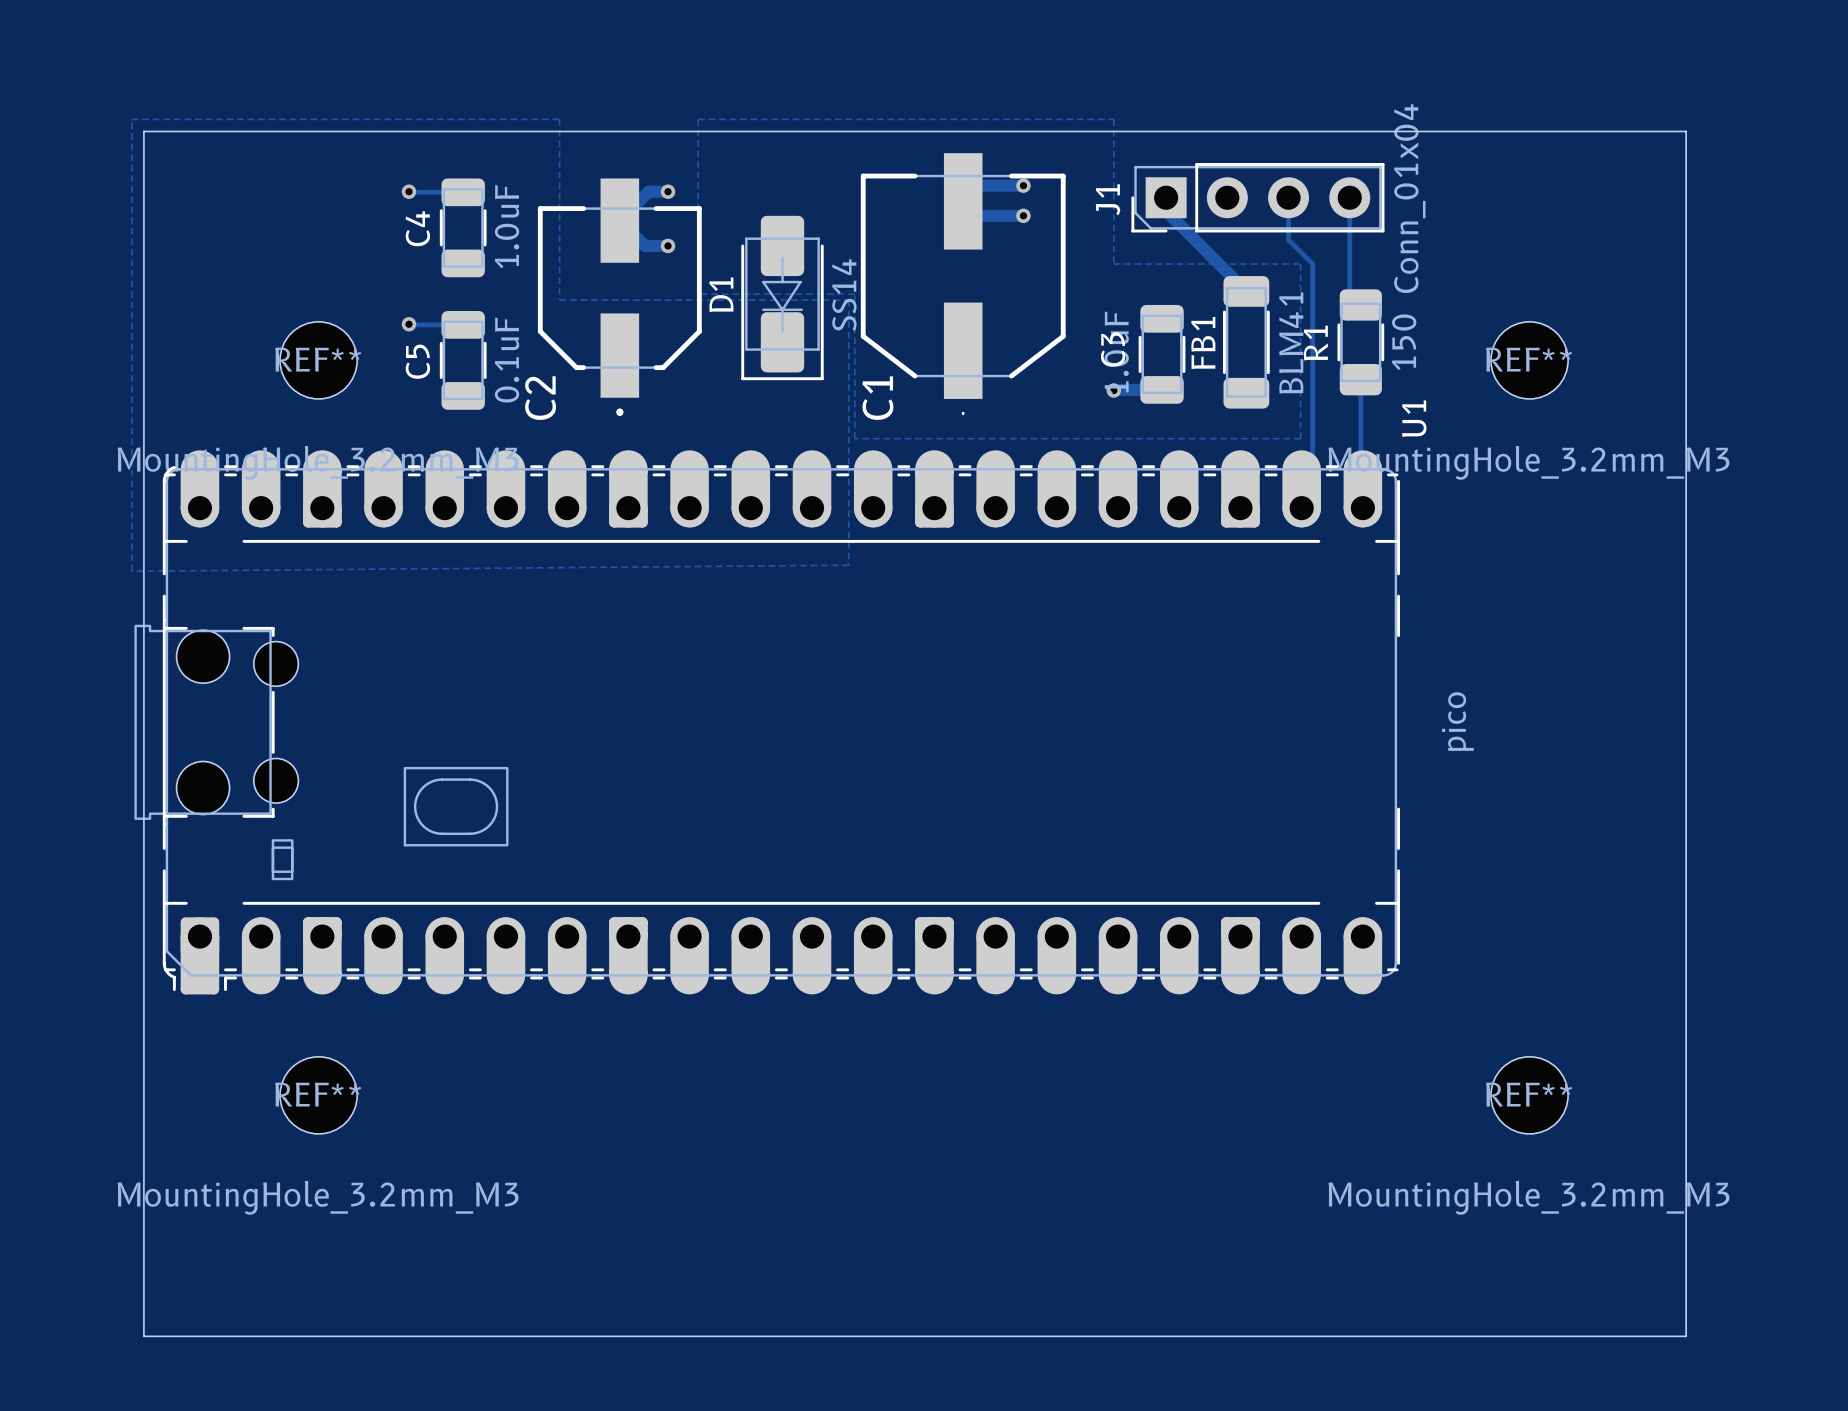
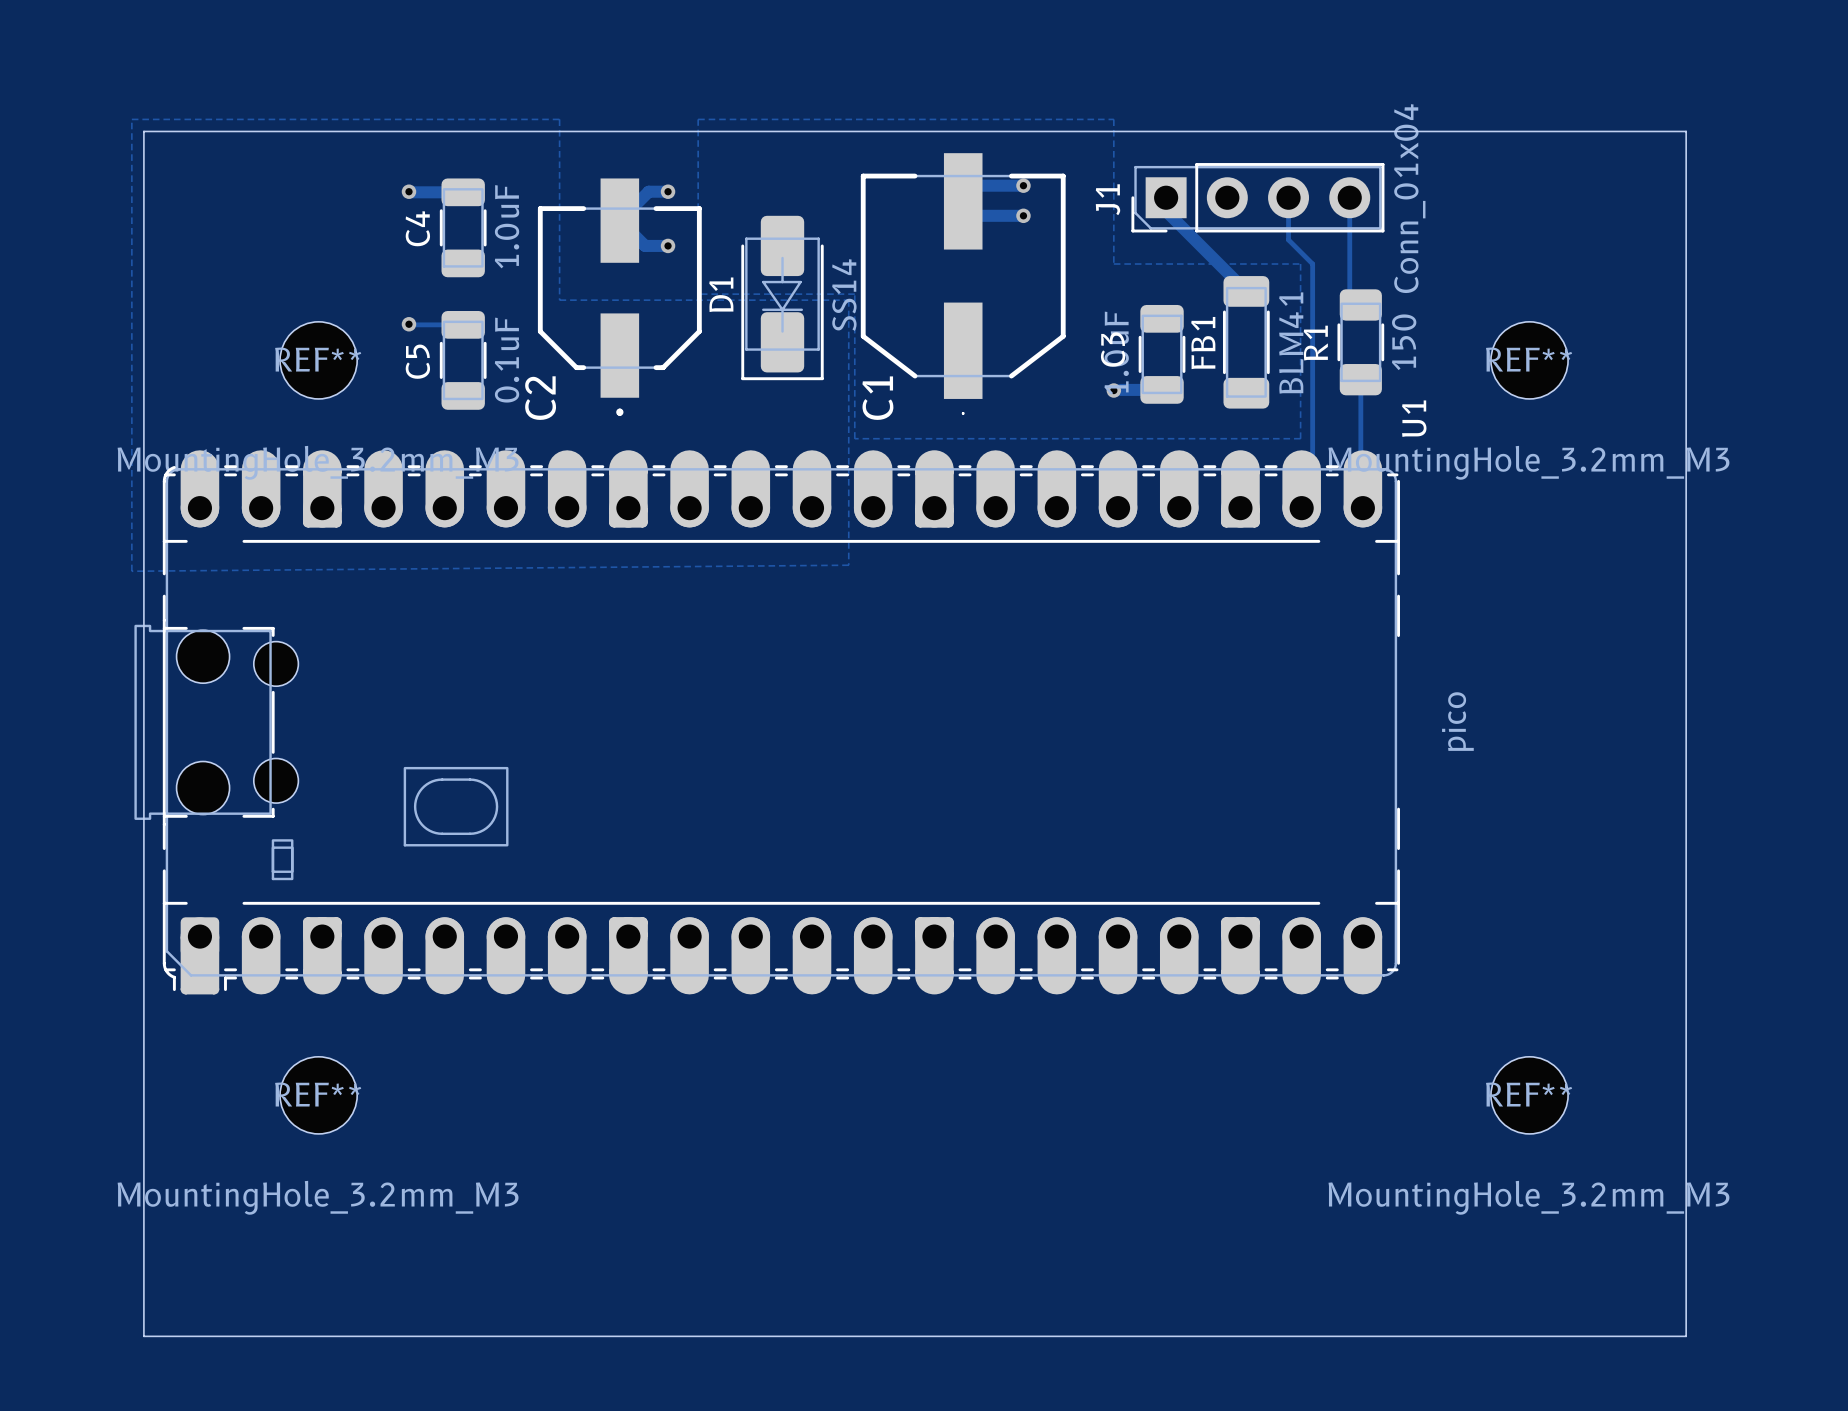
track width: thin (409, 192) (463, 192) -> thick (409, 192) (463, 192)

